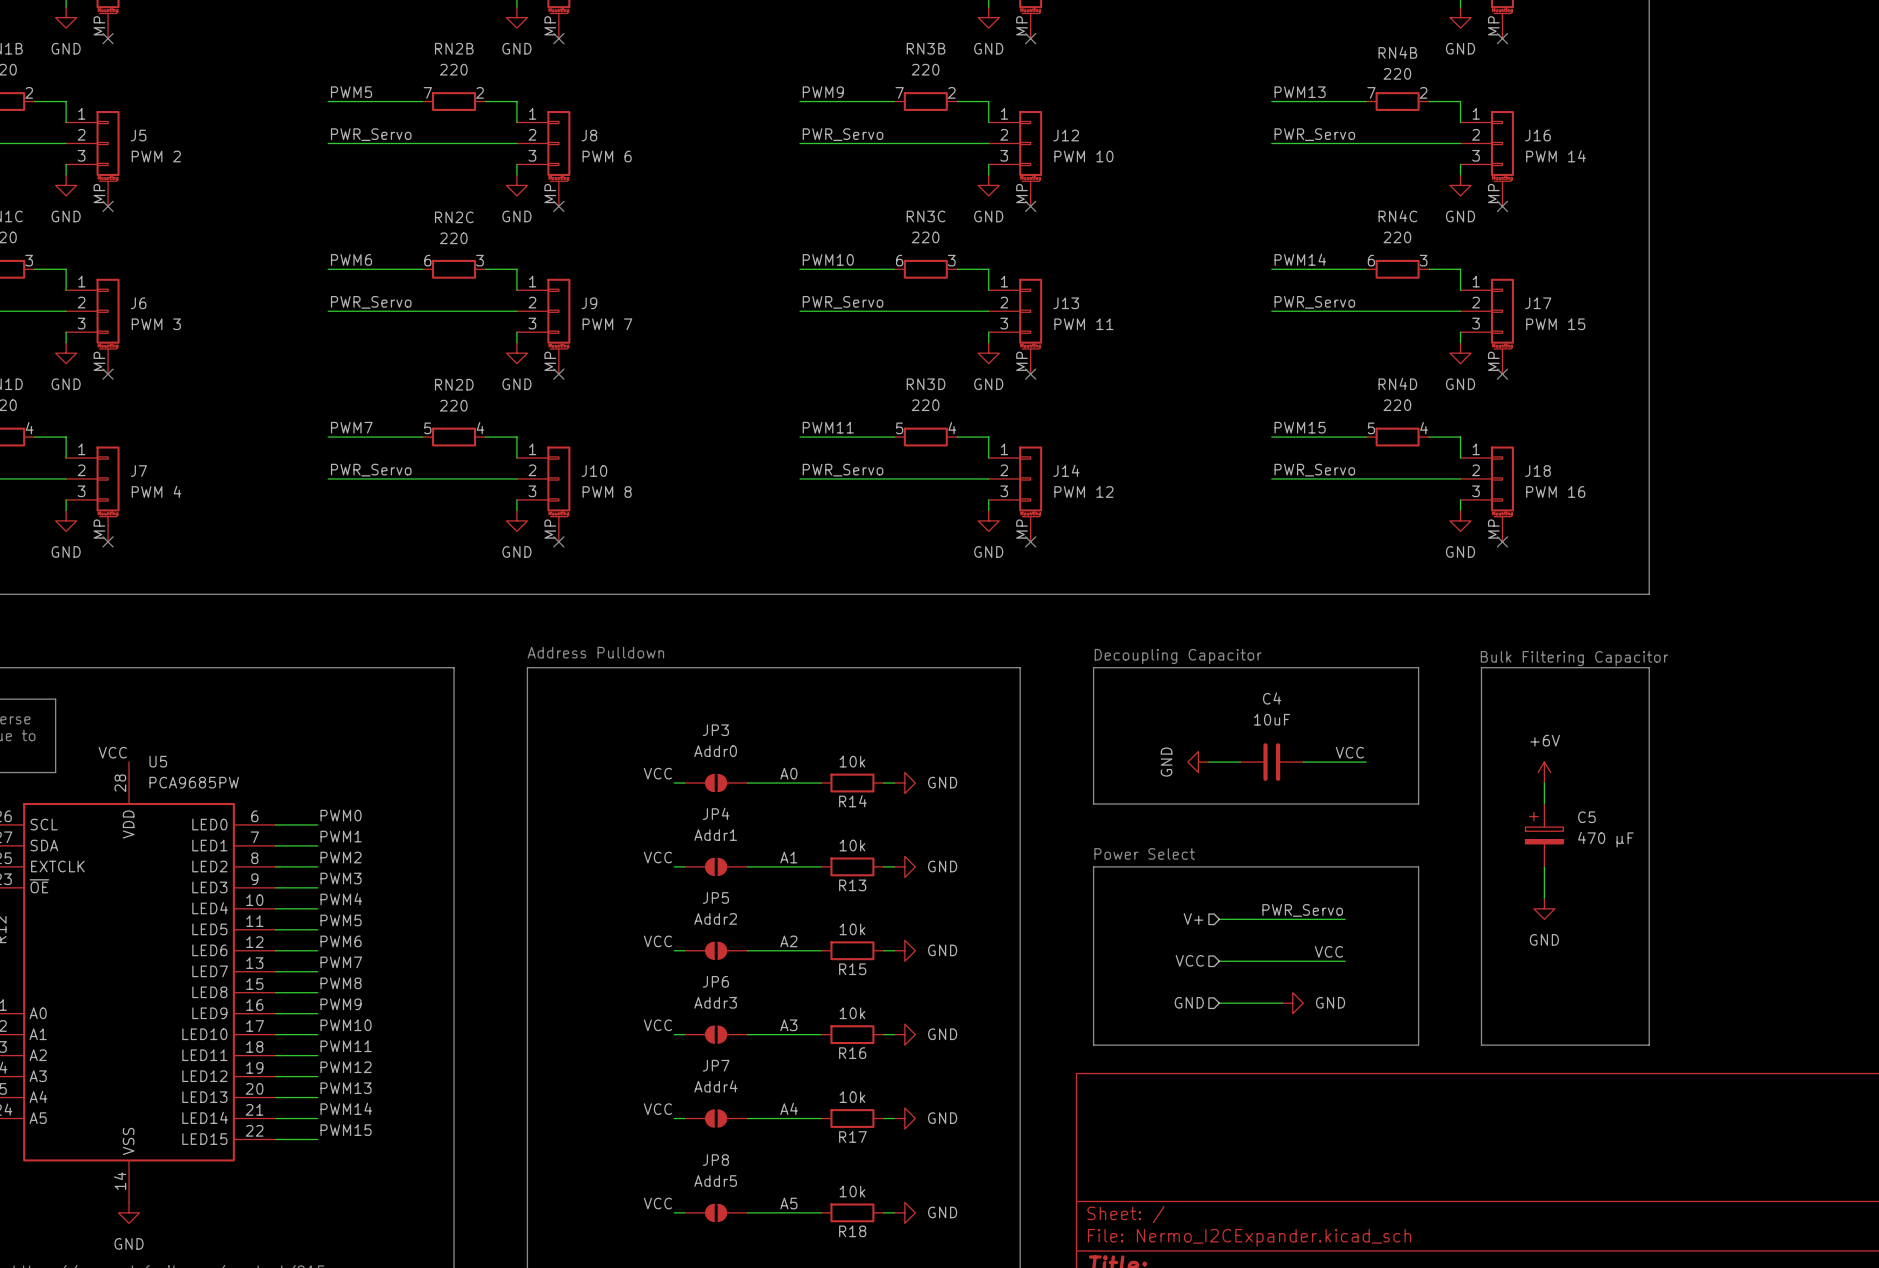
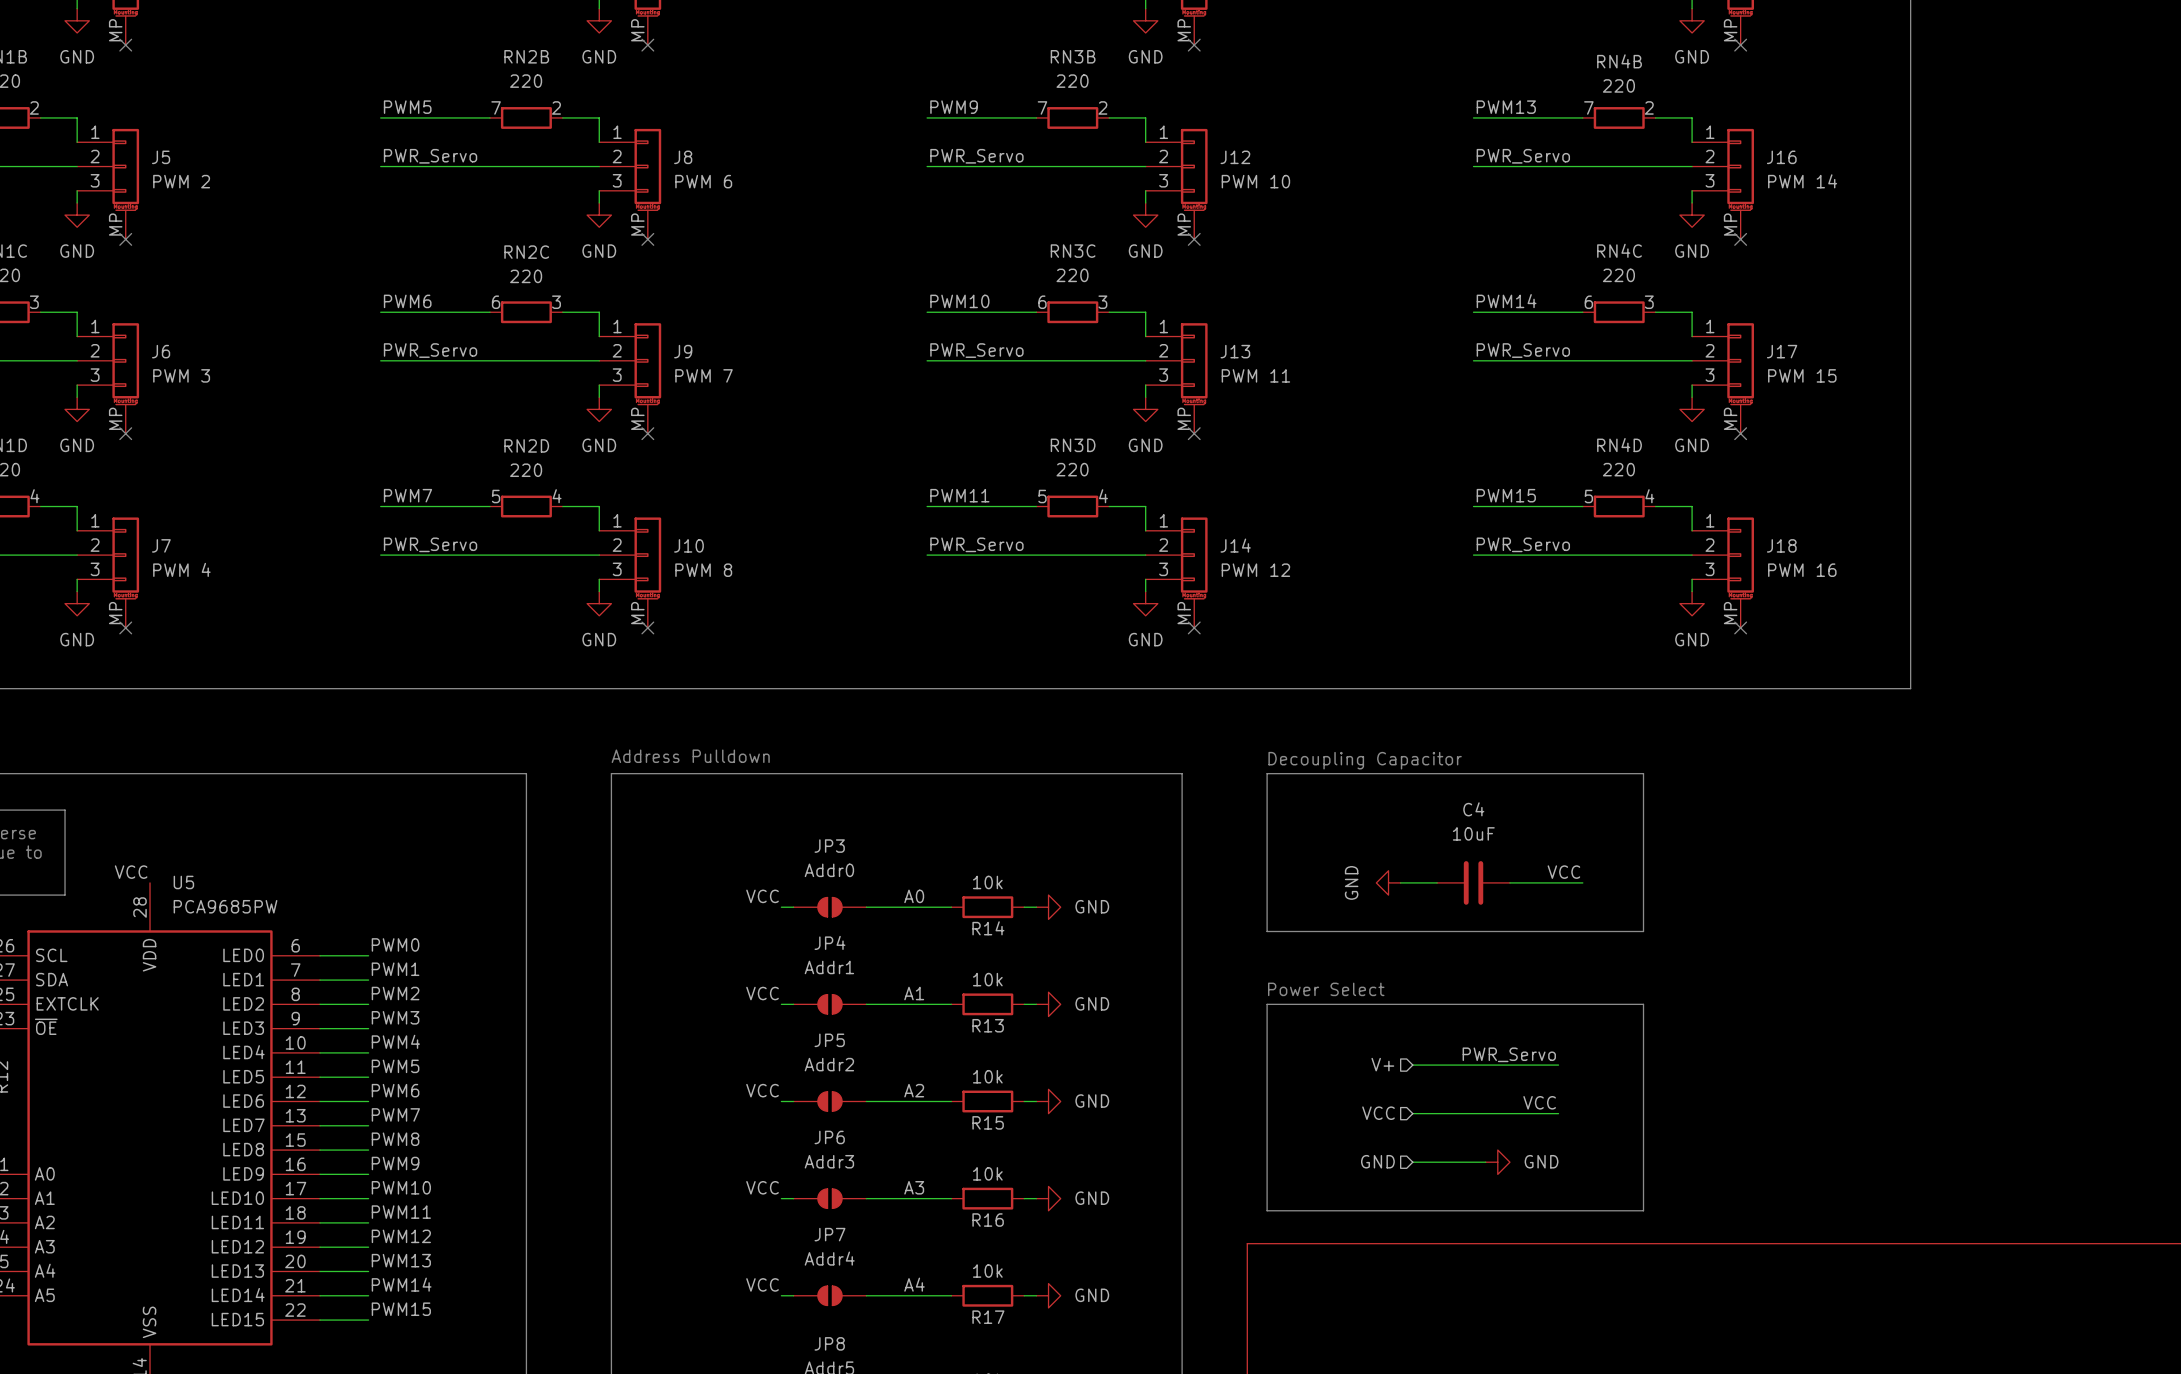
text: Bulk Filtering Capacitor (1574, 658) -> none
line: (1481, 667) (1649, 667) (1649, 1045) (1481, 1045) (1481, 667) -> none
power symbol: +6V (1544, 772) -> none
wire: (1544, 783) (1544, 803) -> none
C5: 470 µF (1544, 835) -> none
wire: (1544, 866) (1544, 898) -> none
power symbol: GND (1544, 908) -> none

